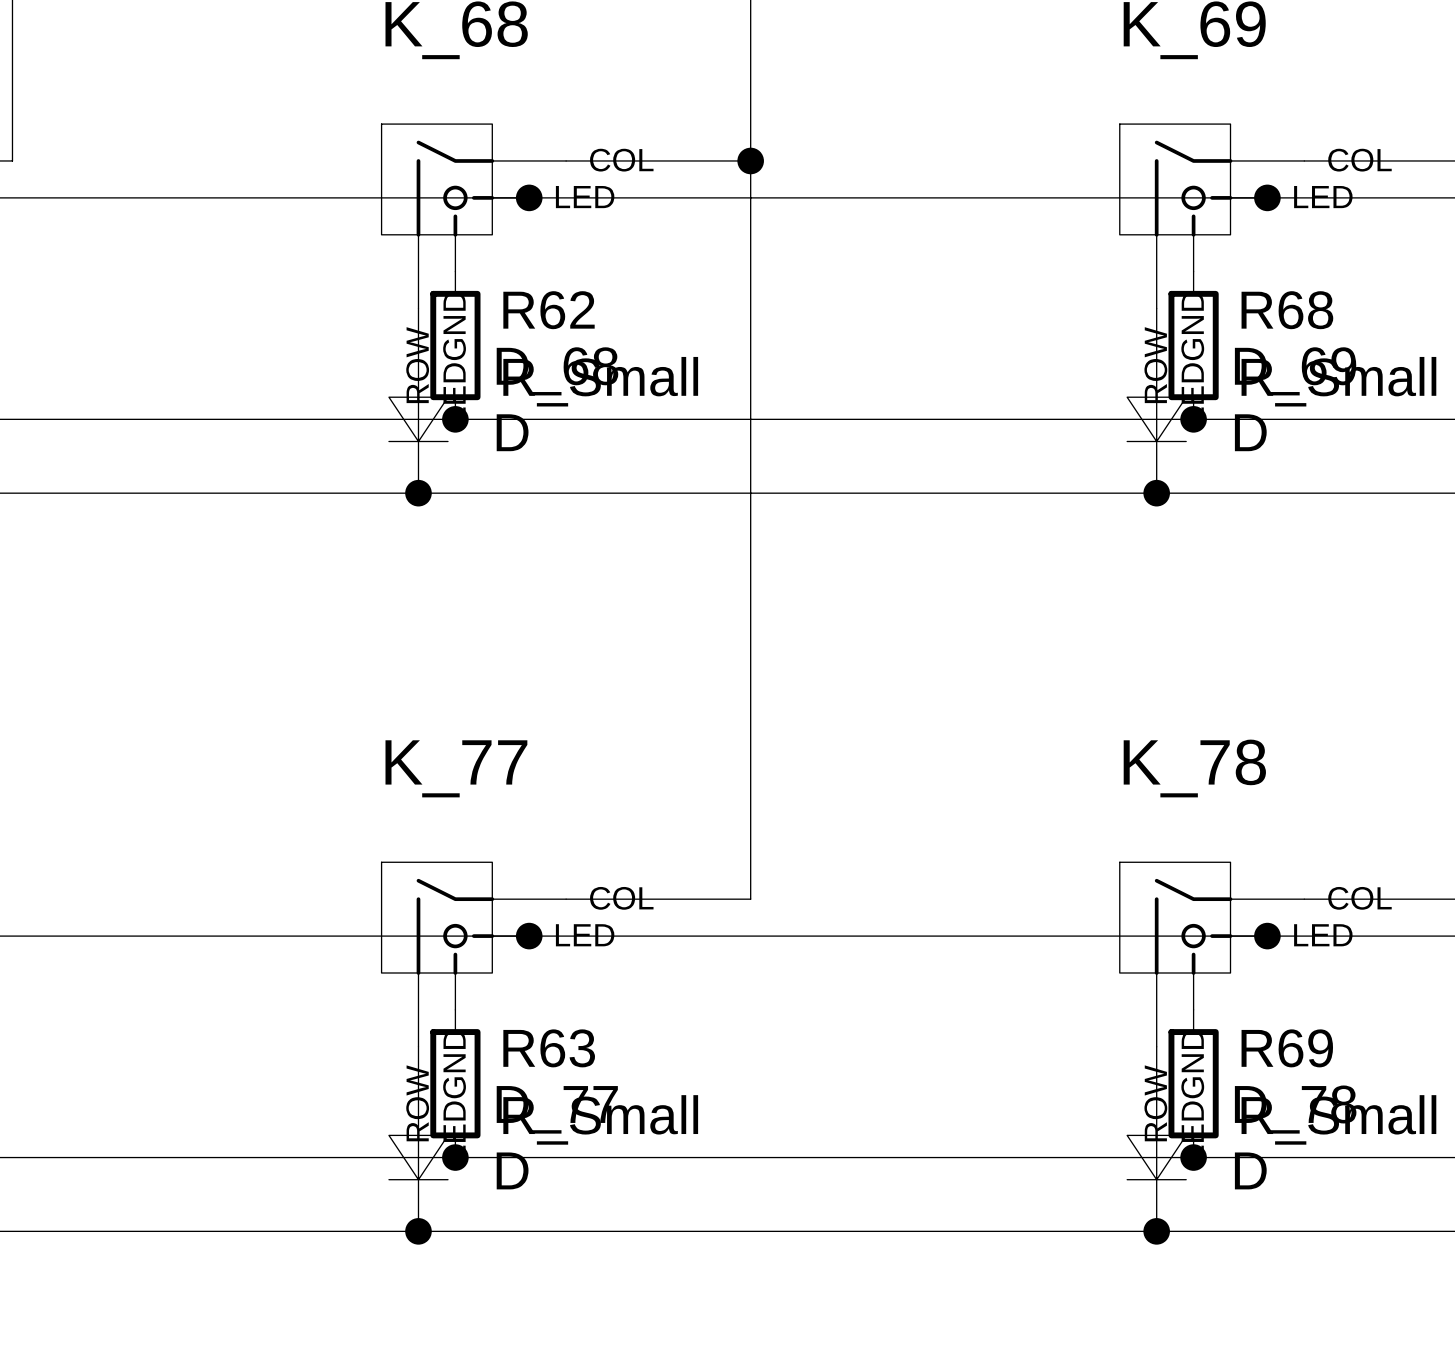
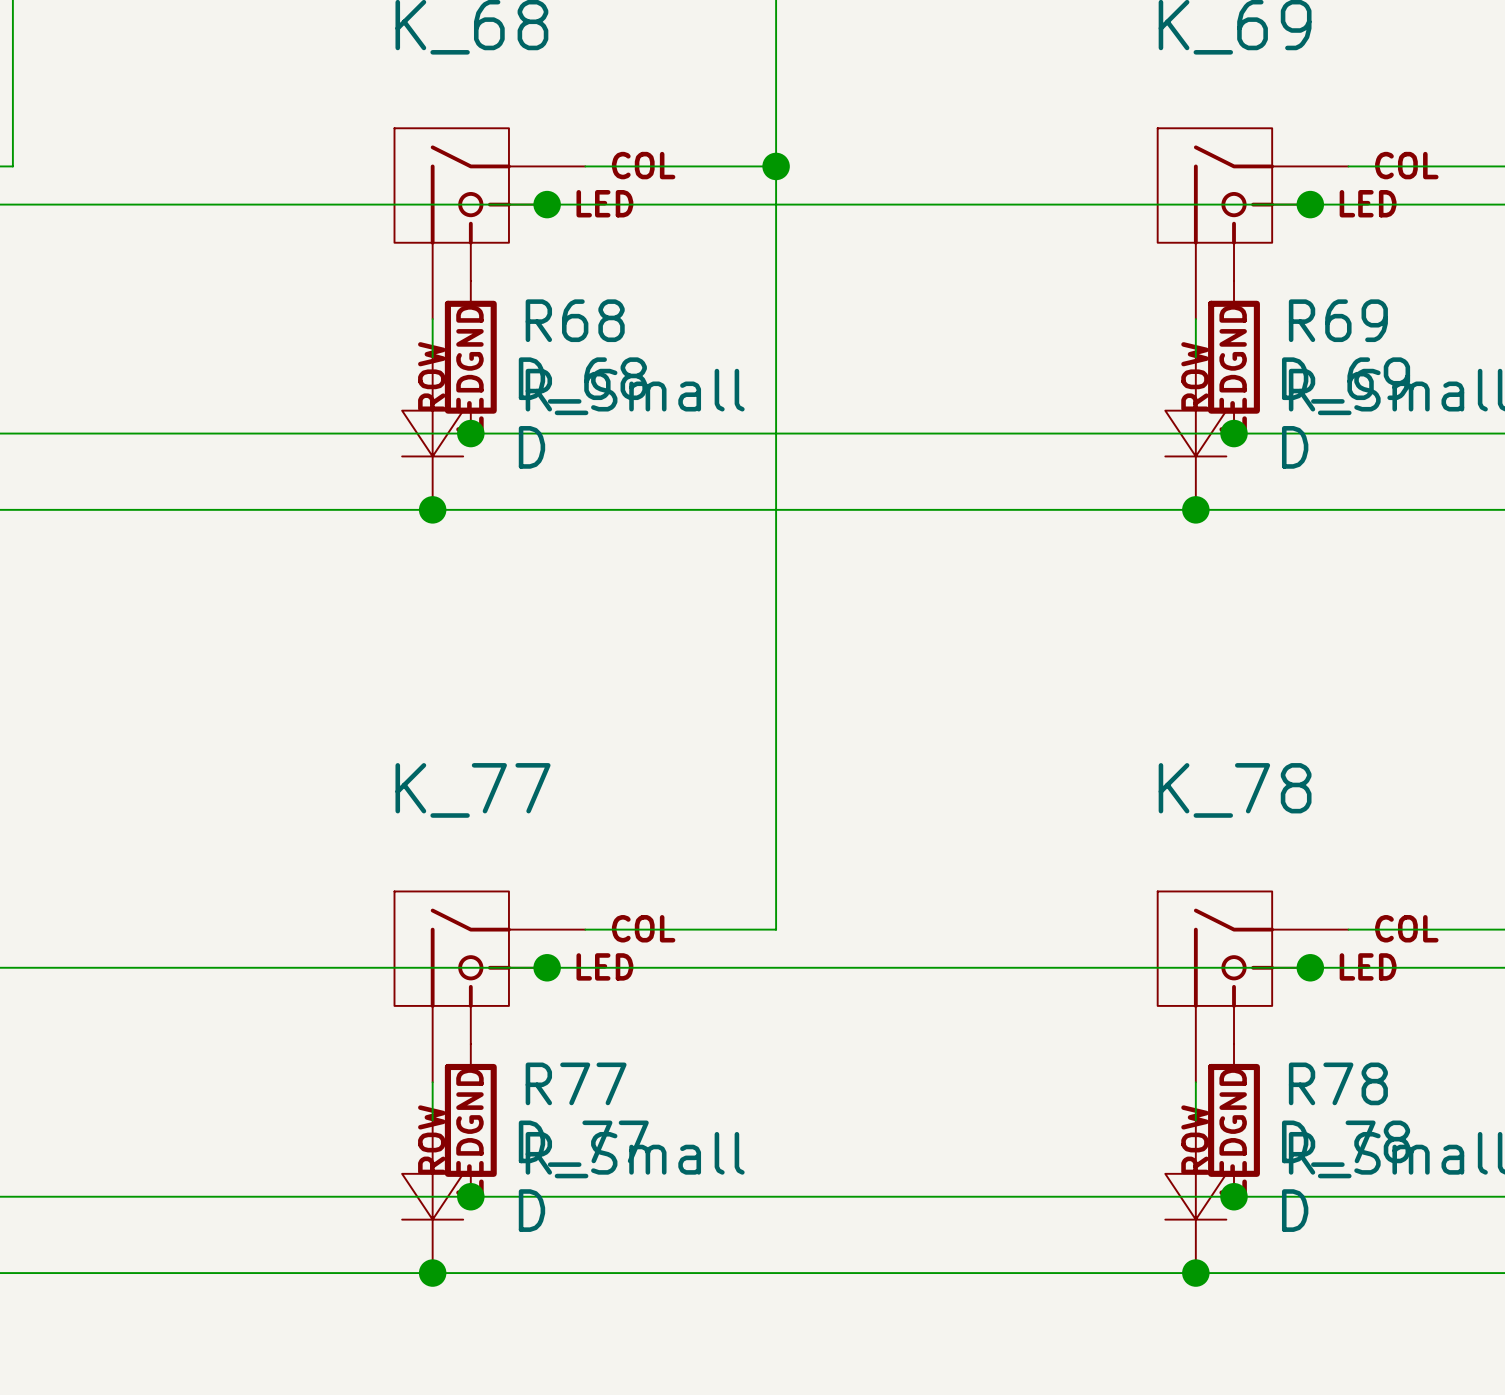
R62 name: R62 (549, 310) -> R68 (575, 320)
R68 name: R68 (1287, 310) -> R69 (1338, 320)
R63 name: R63 (549, 1048) -> R77 (576, 1083)
R69 name: R69 (1287, 1048) -> R78 (1338, 1083)

